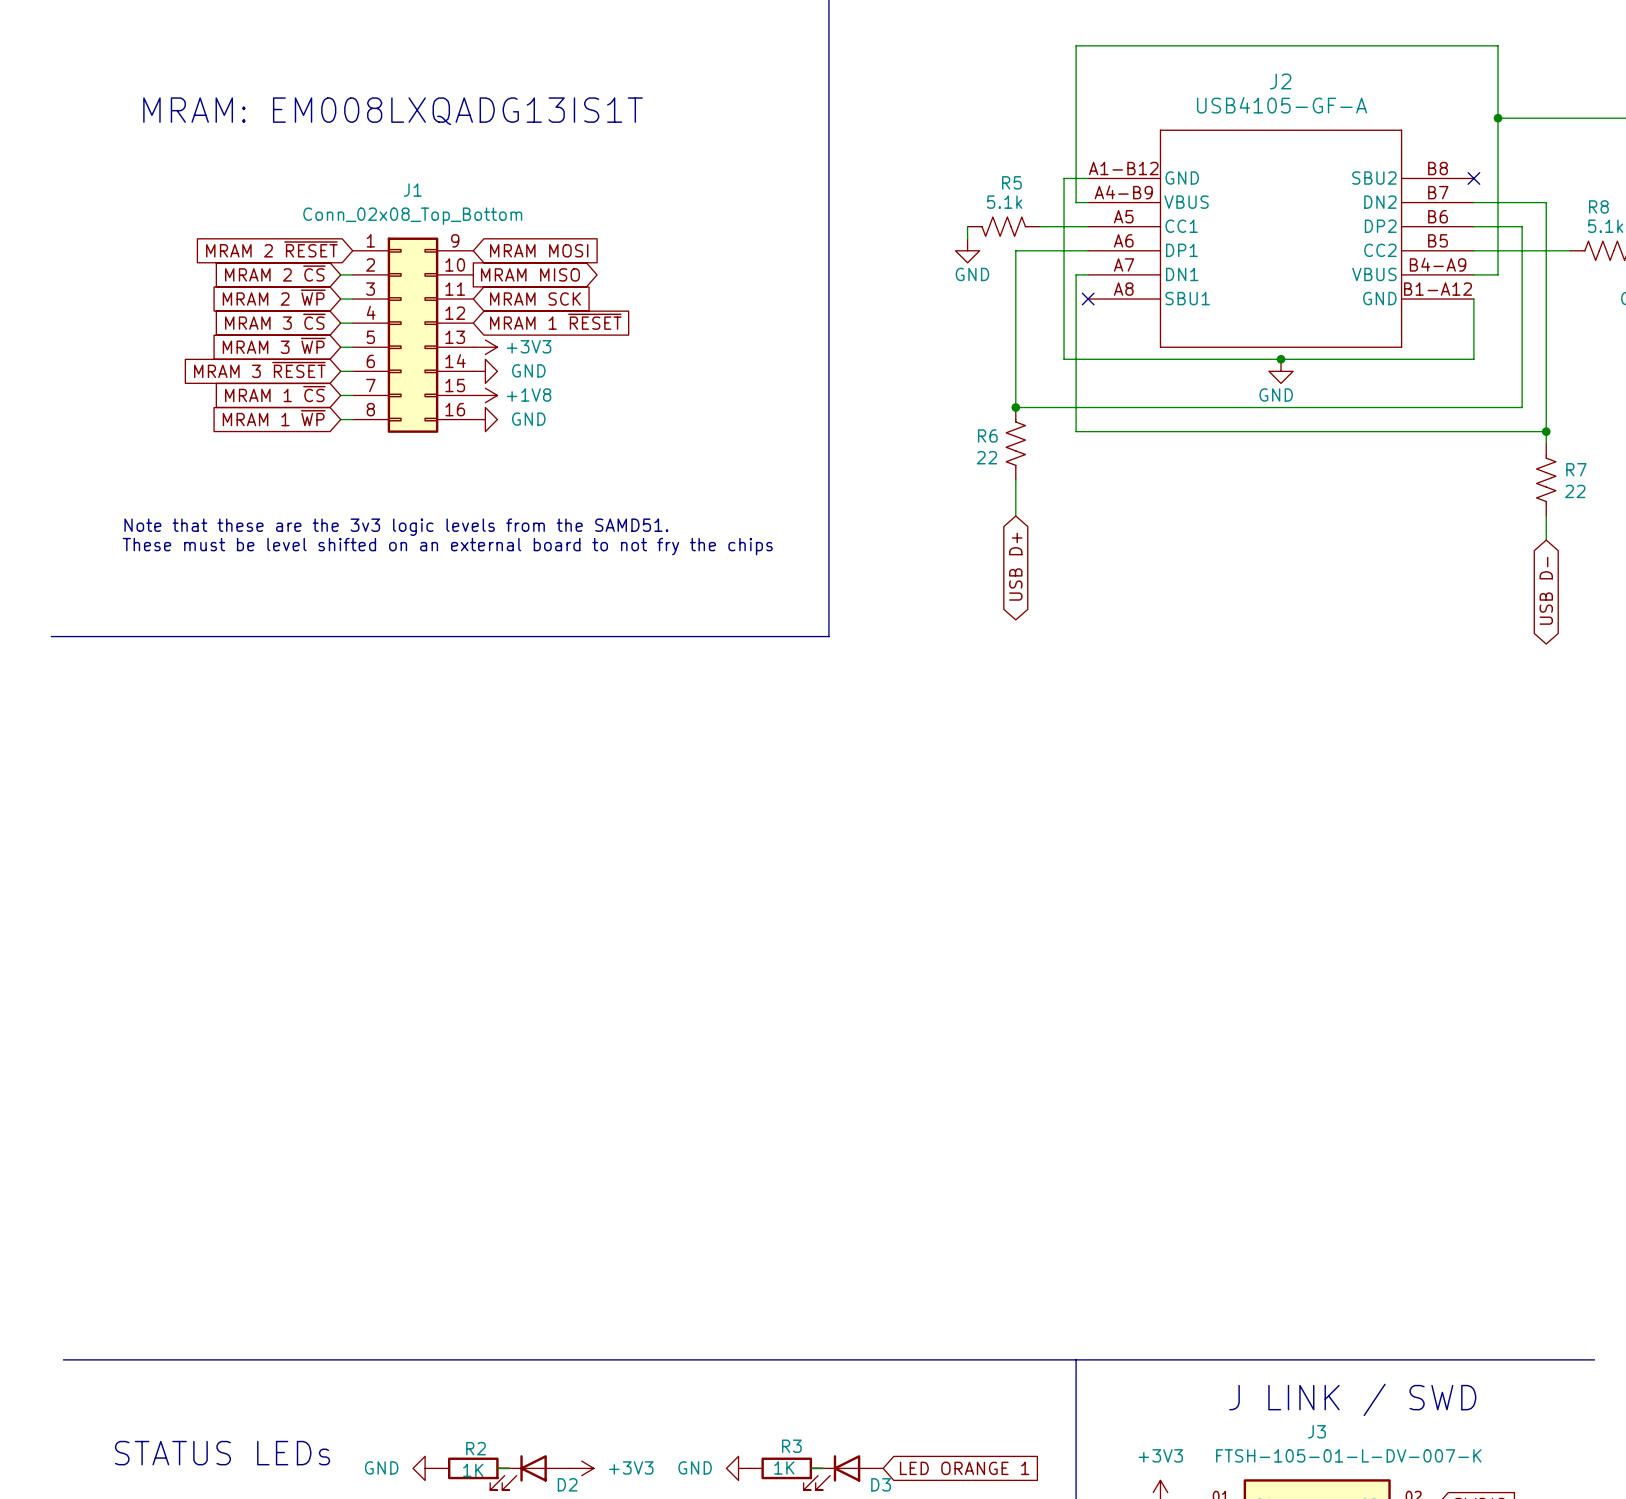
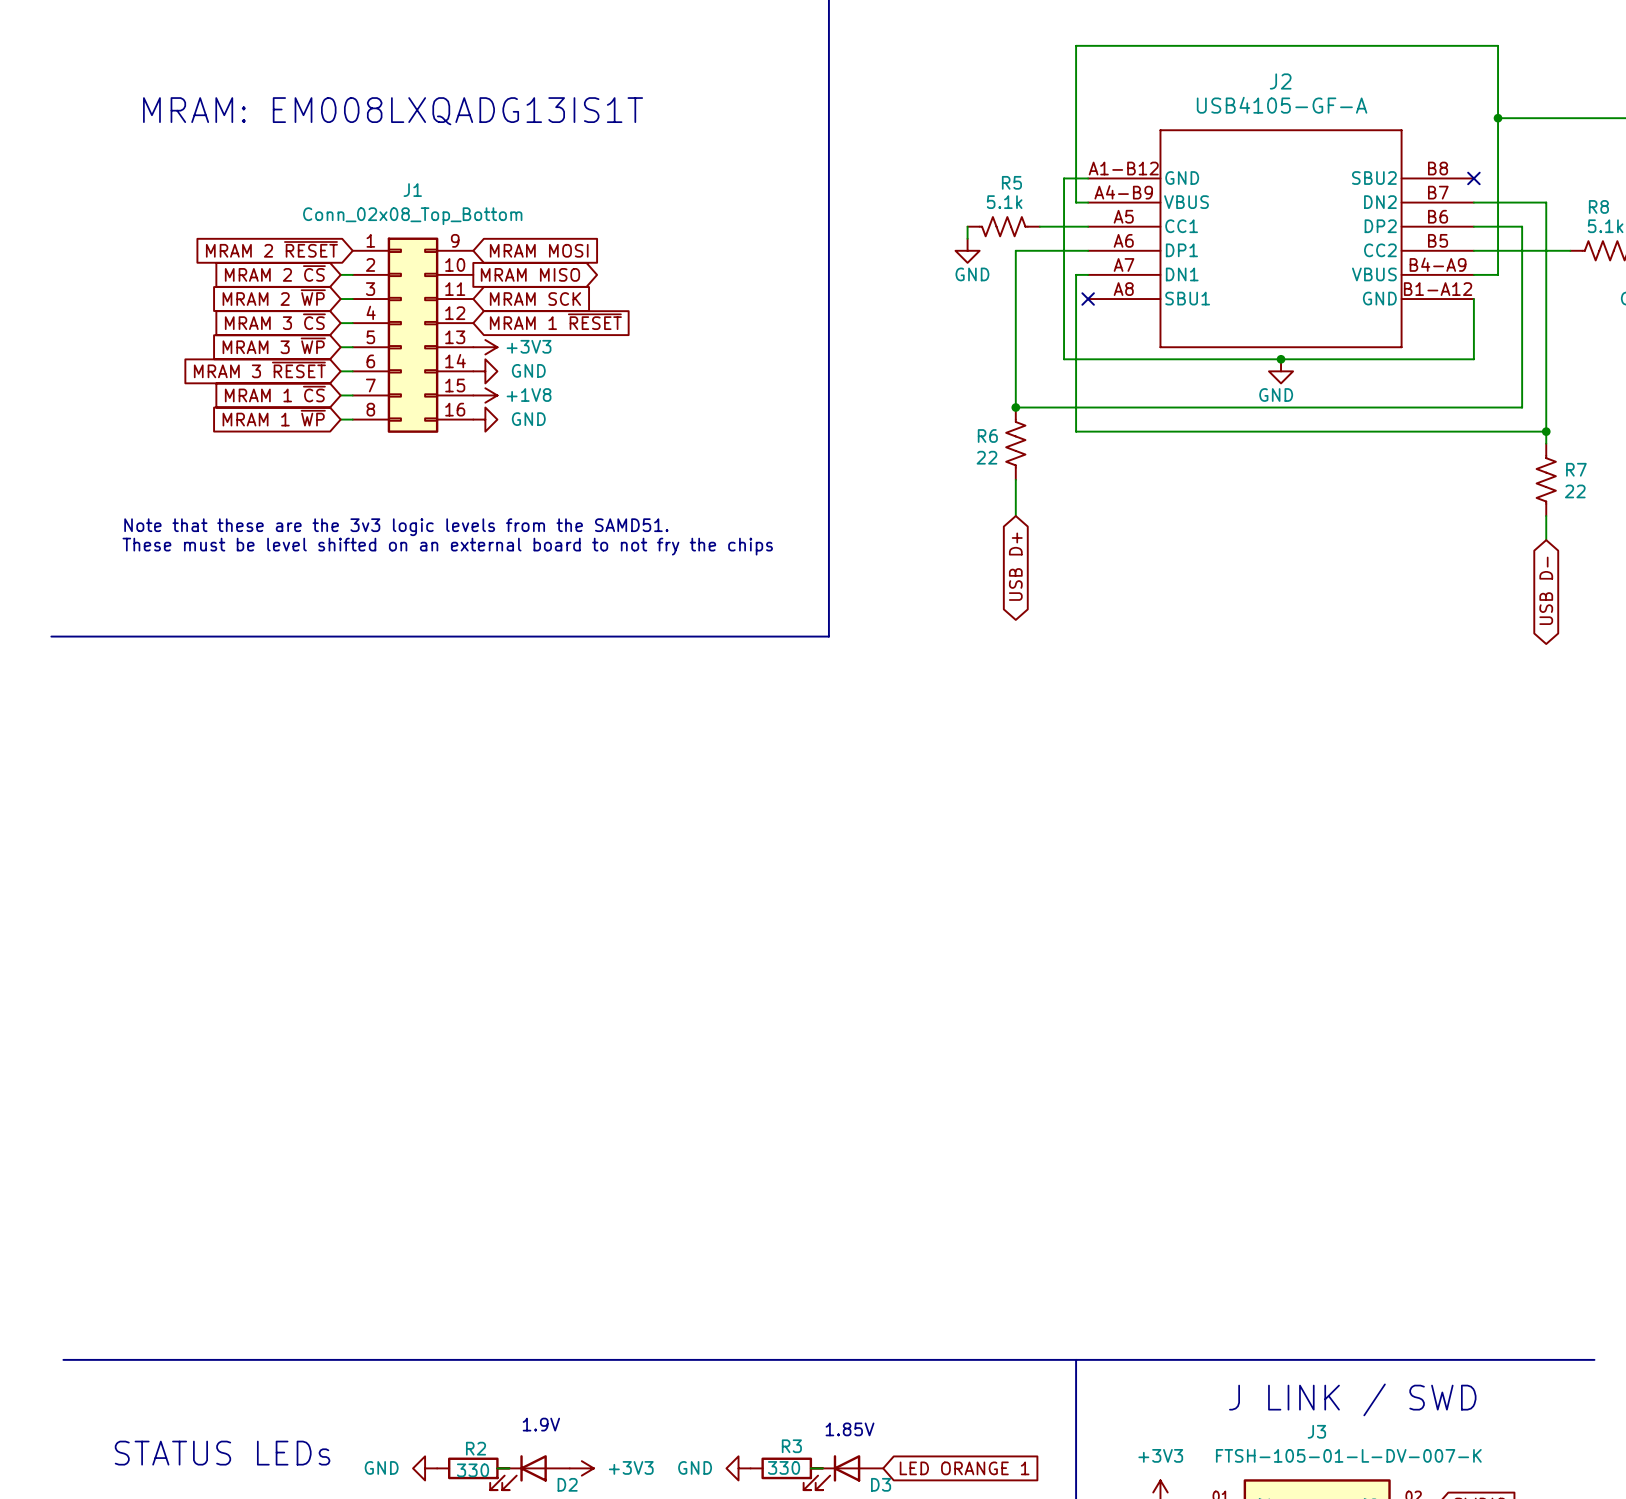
text: none -> 1.9V (541, 1424)
text: none -> 1.85V (850, 1429)
R3 value: 1K (784, 1467) -> 330 (784, 1467)
R2 value: 1K (473, 1470) -> 330 (473, 1470)

